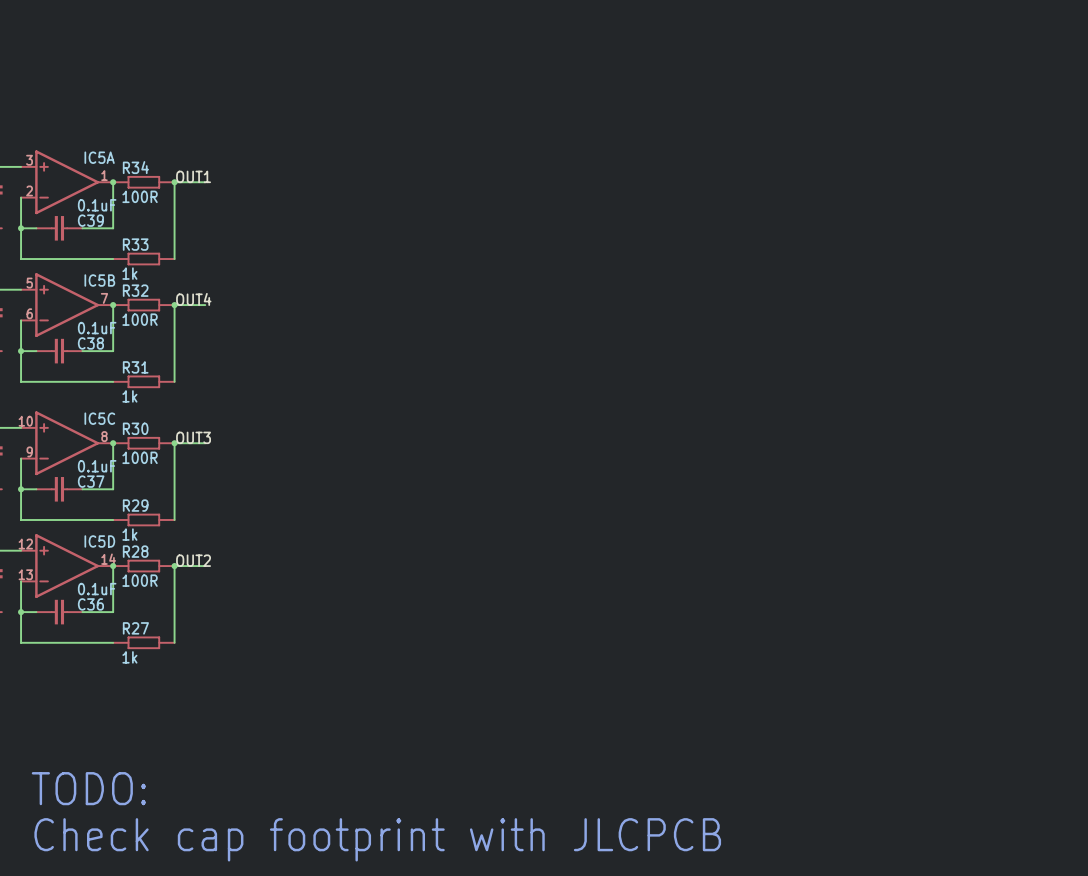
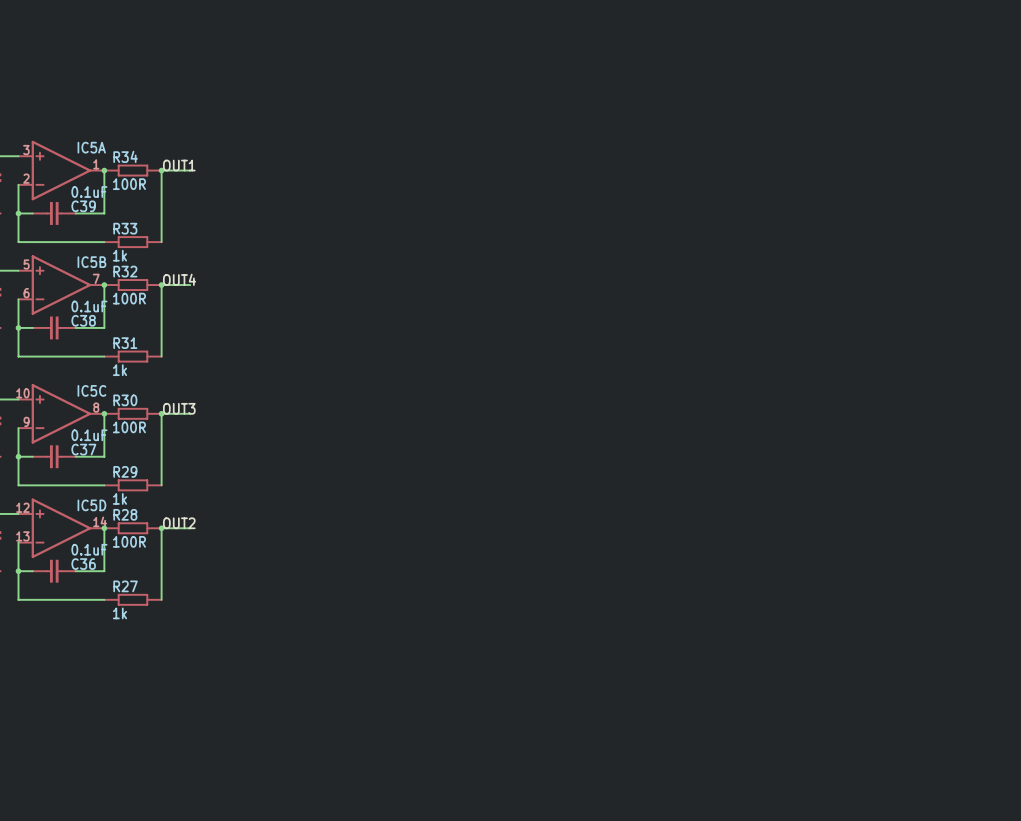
text: TODO: (88, 788) -> none
text: Check cap footprint with JLCPCB (377, 839) -> none

